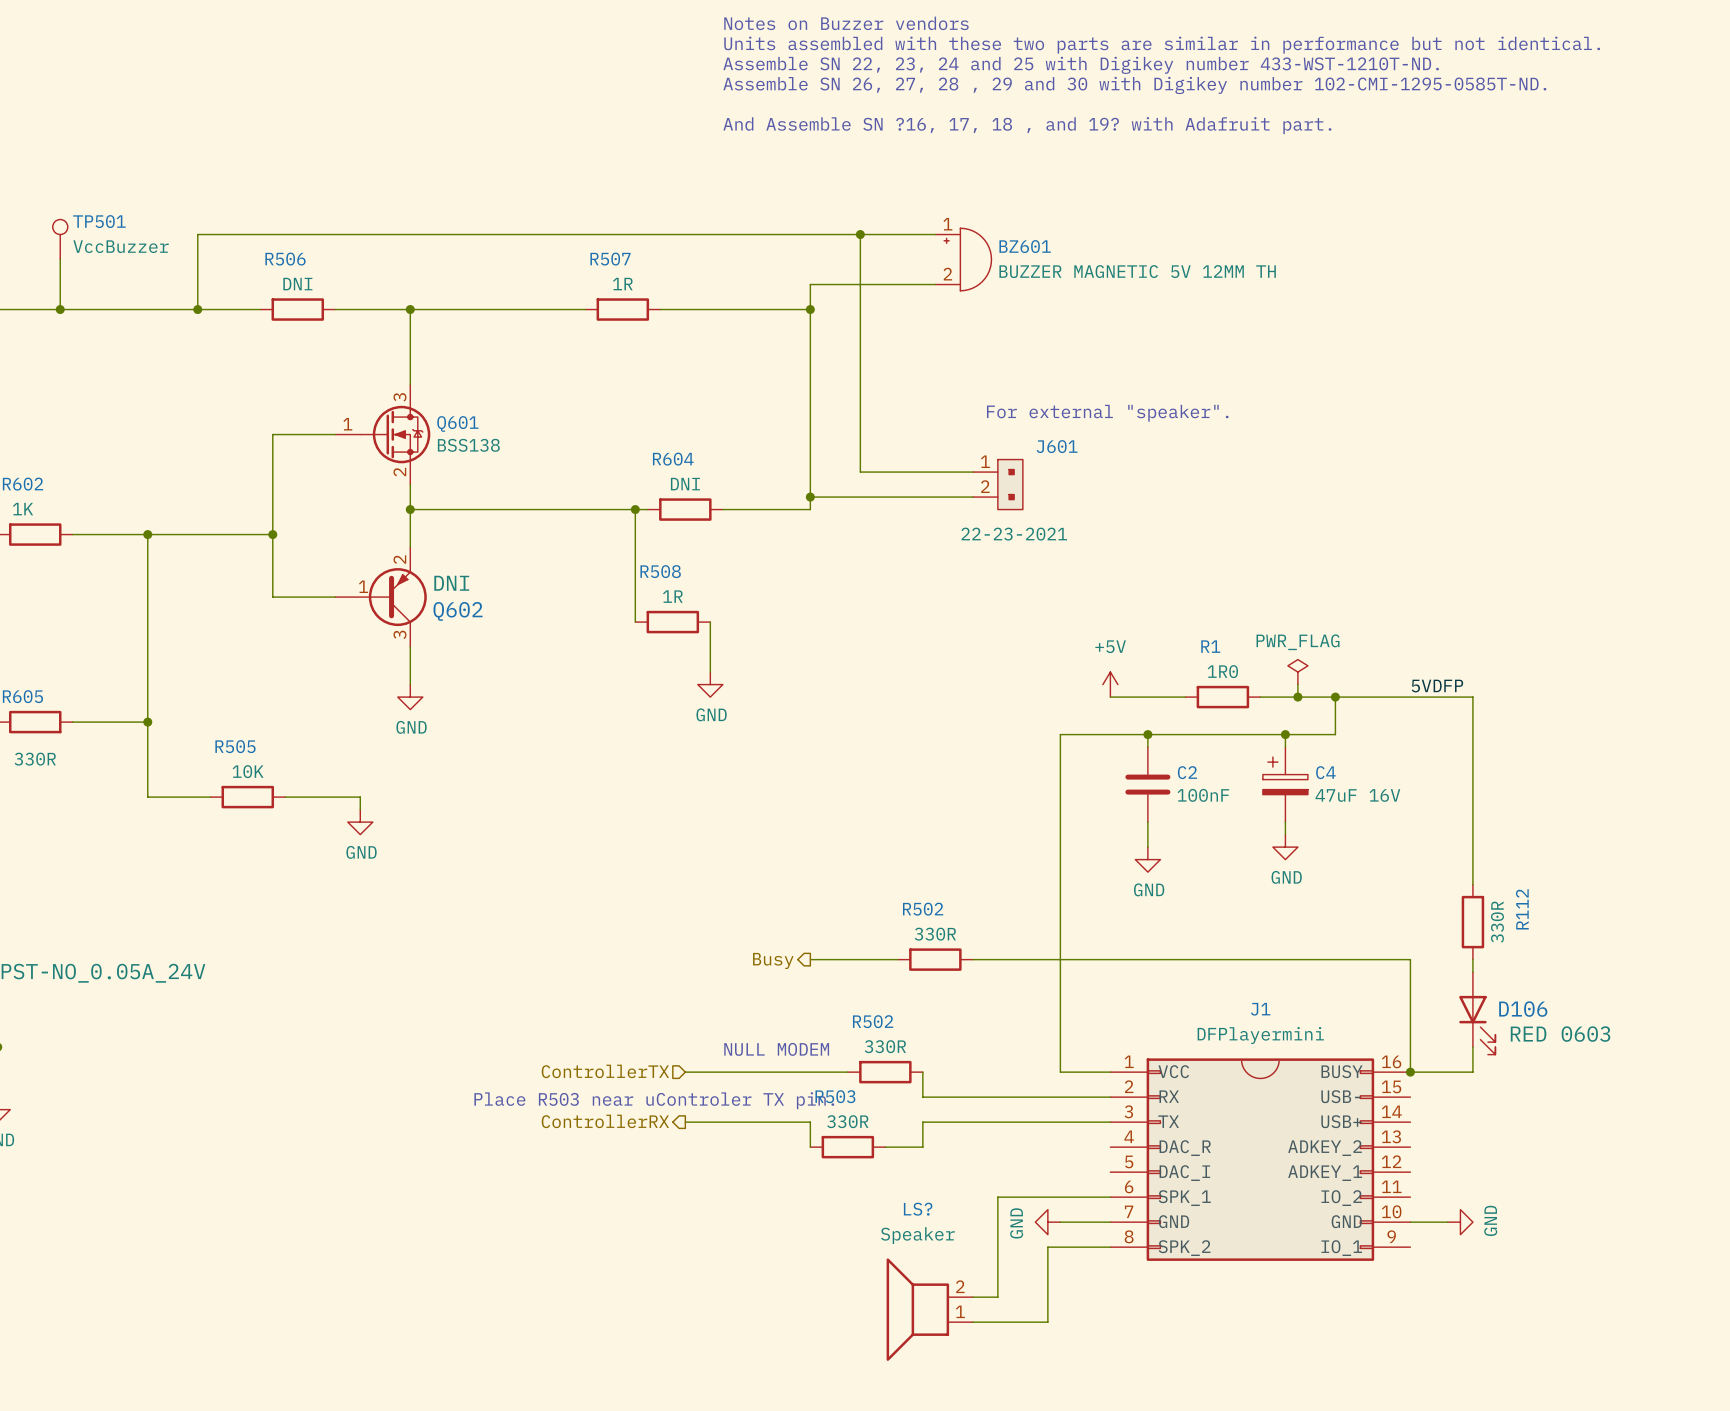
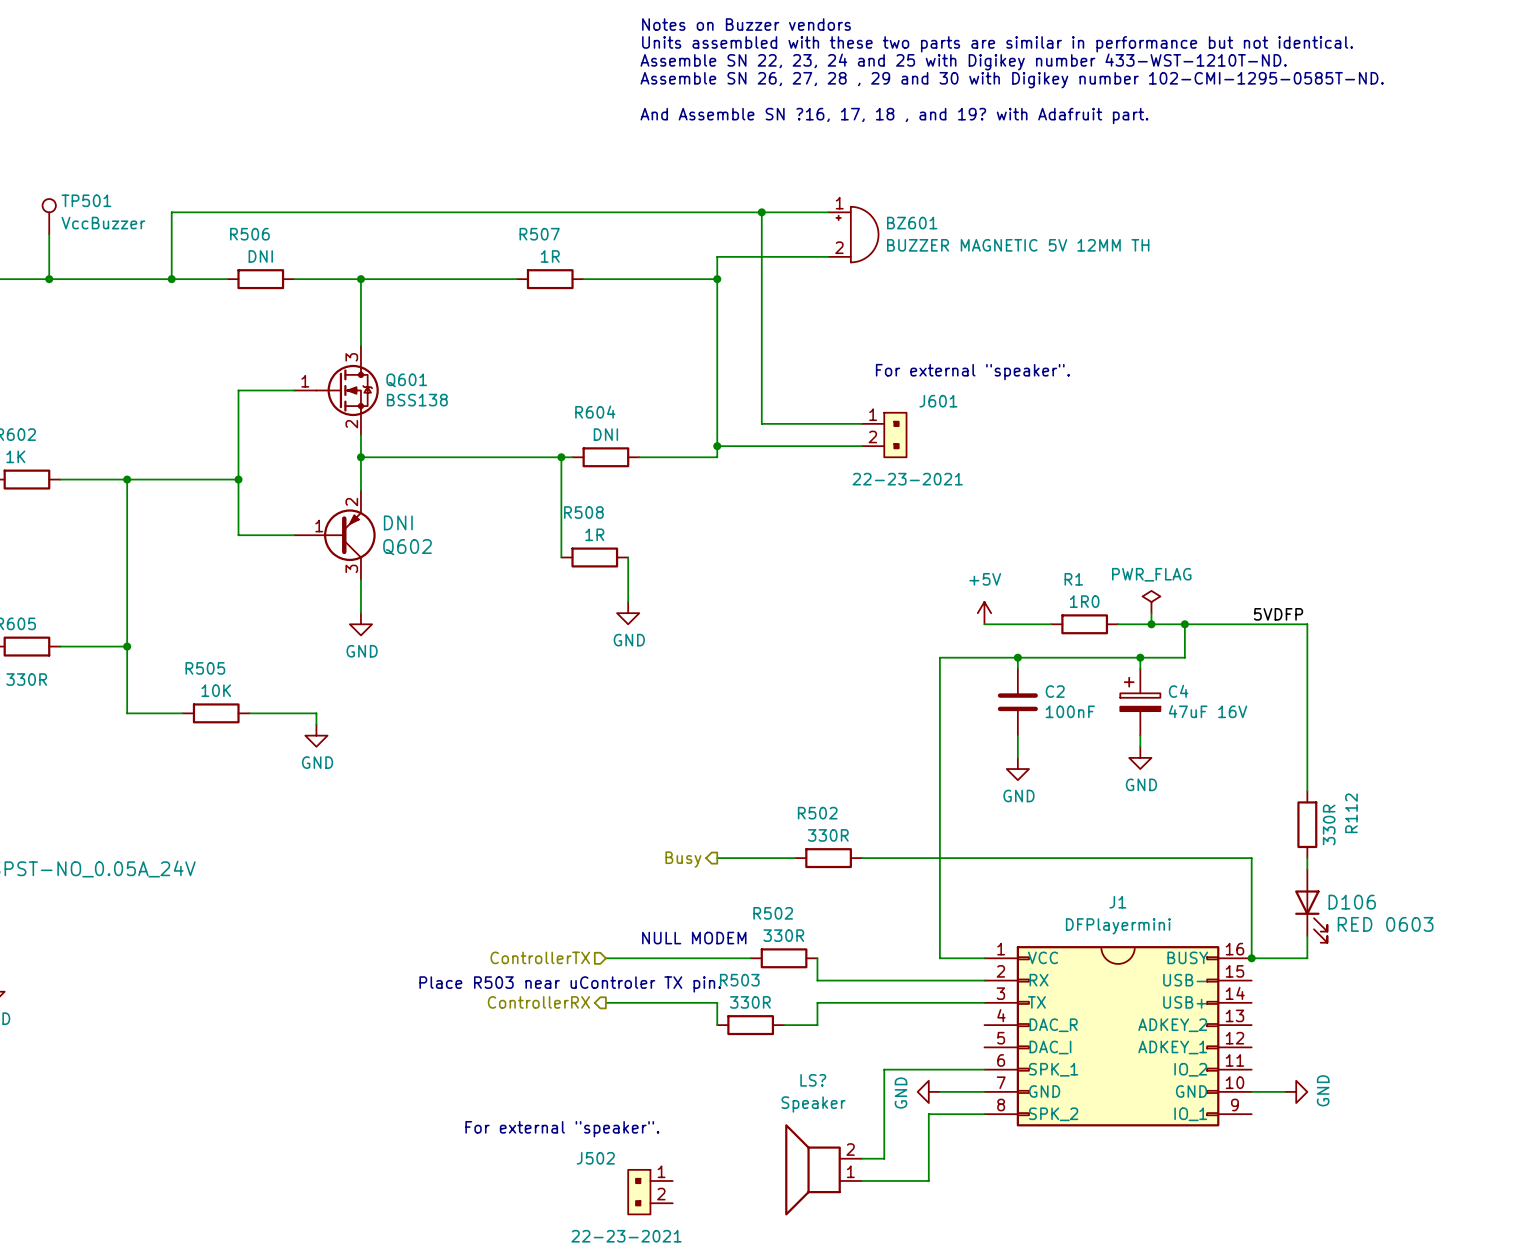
text: none -> For external "speaker". (562, 1129)
J502: none -> 22-23-2021 (650, 1192)

